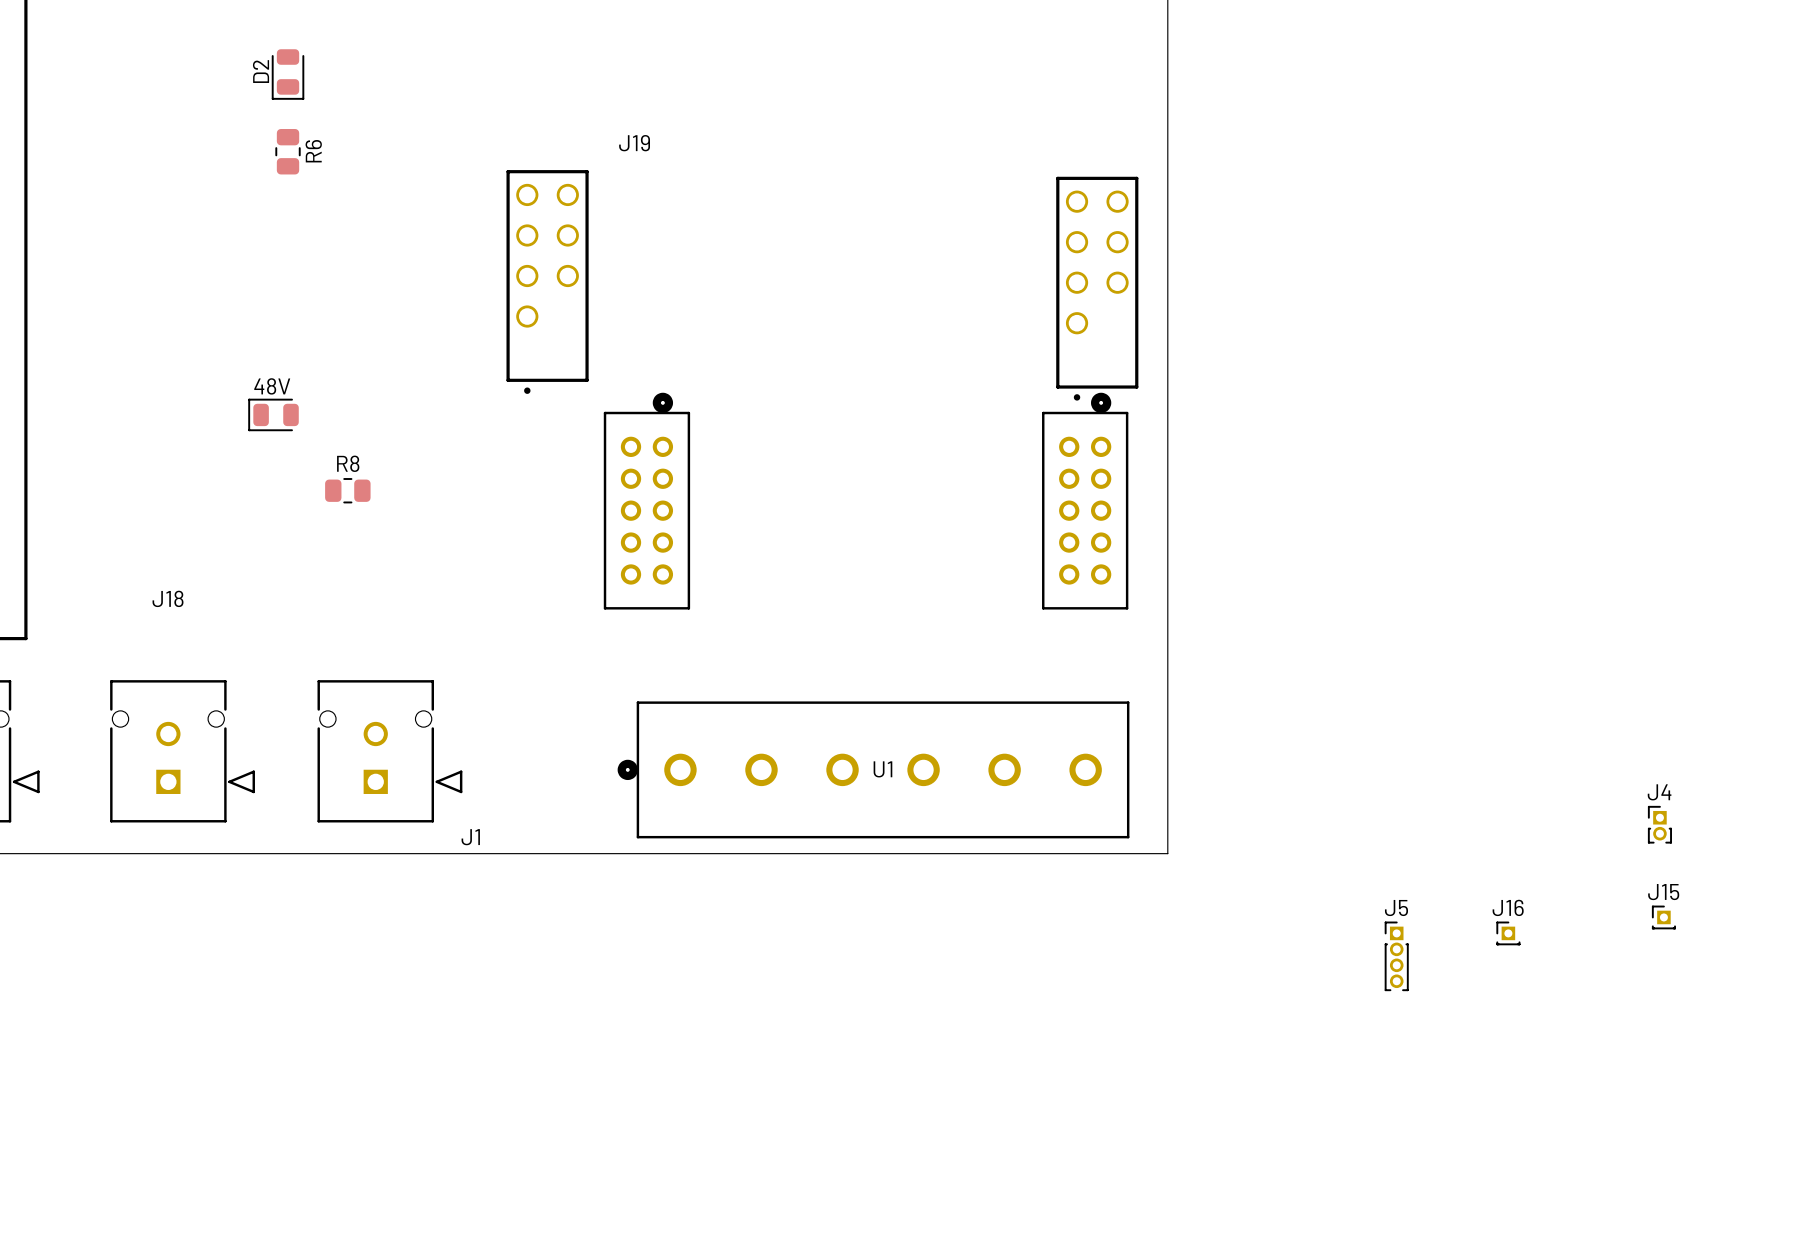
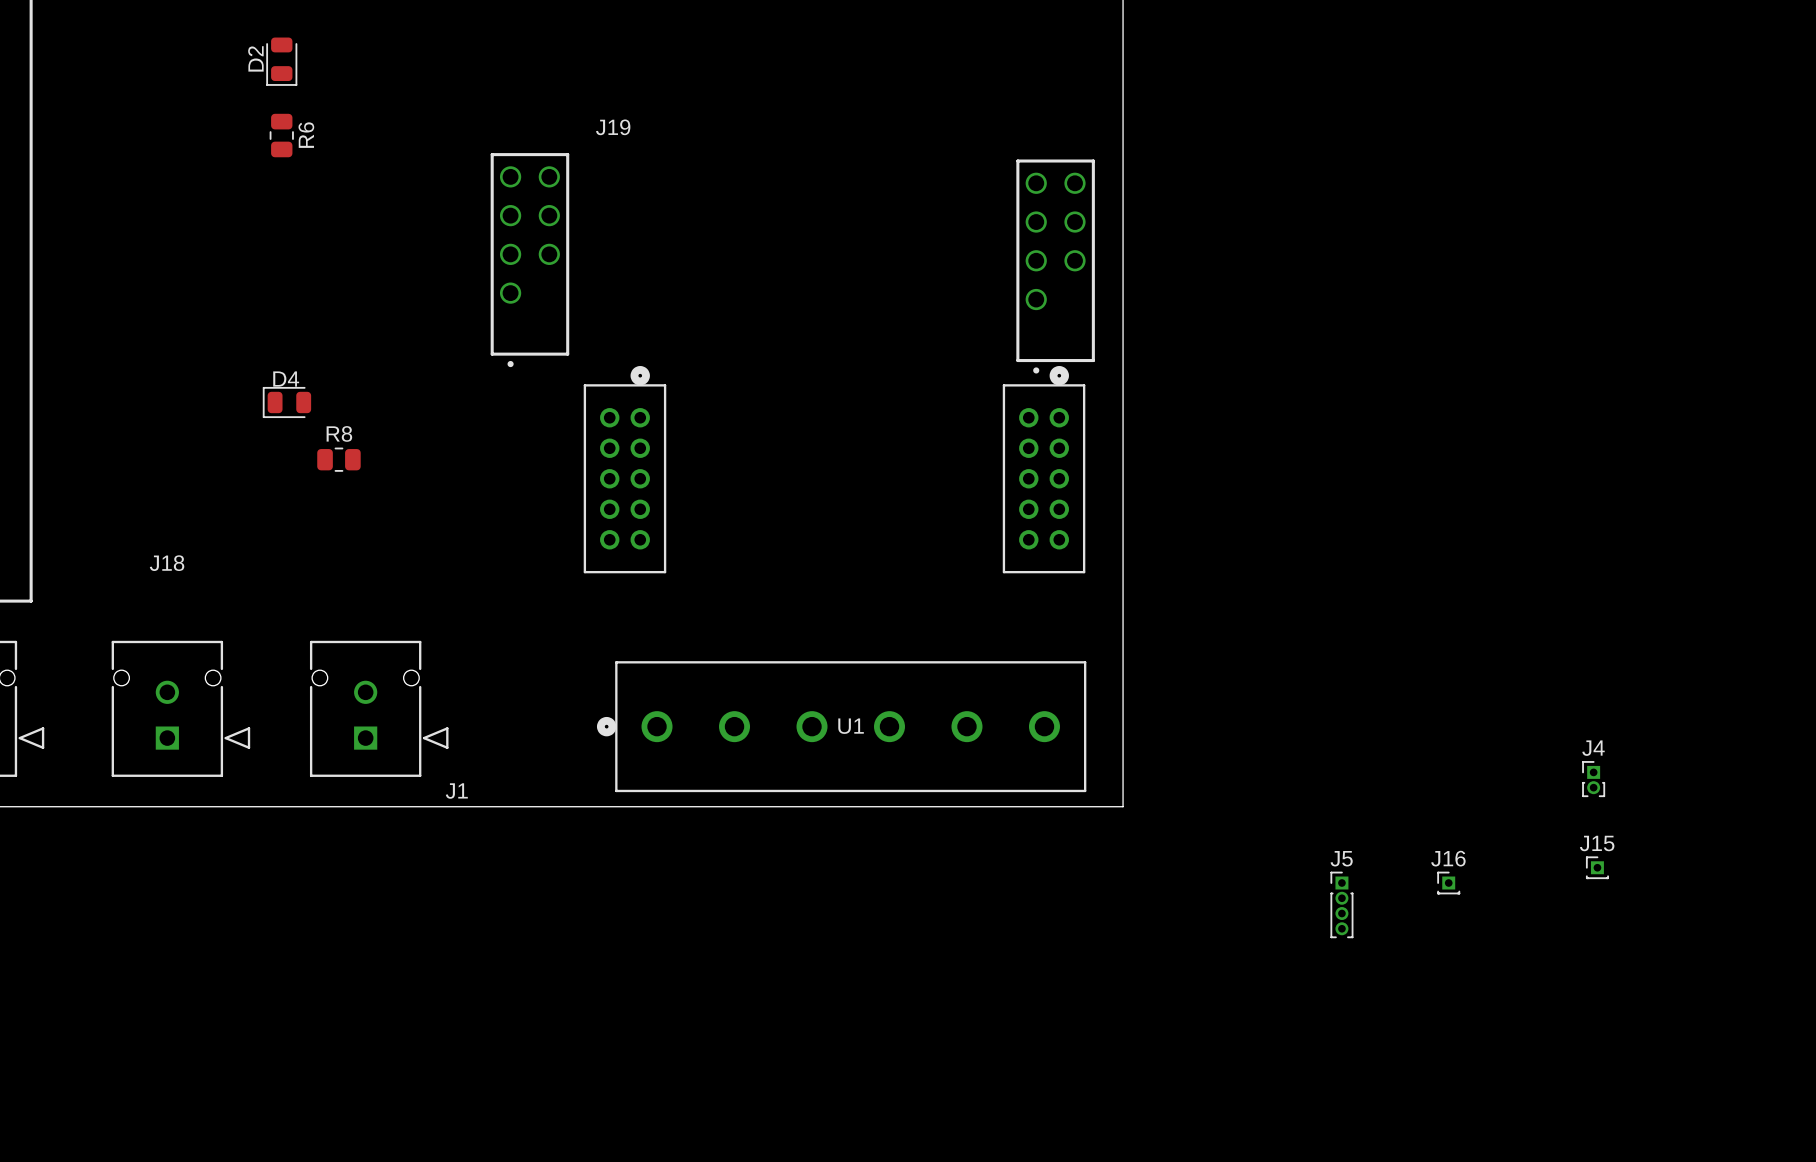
48V: (273, 414) -> none
D4: none -> (286, 402)

